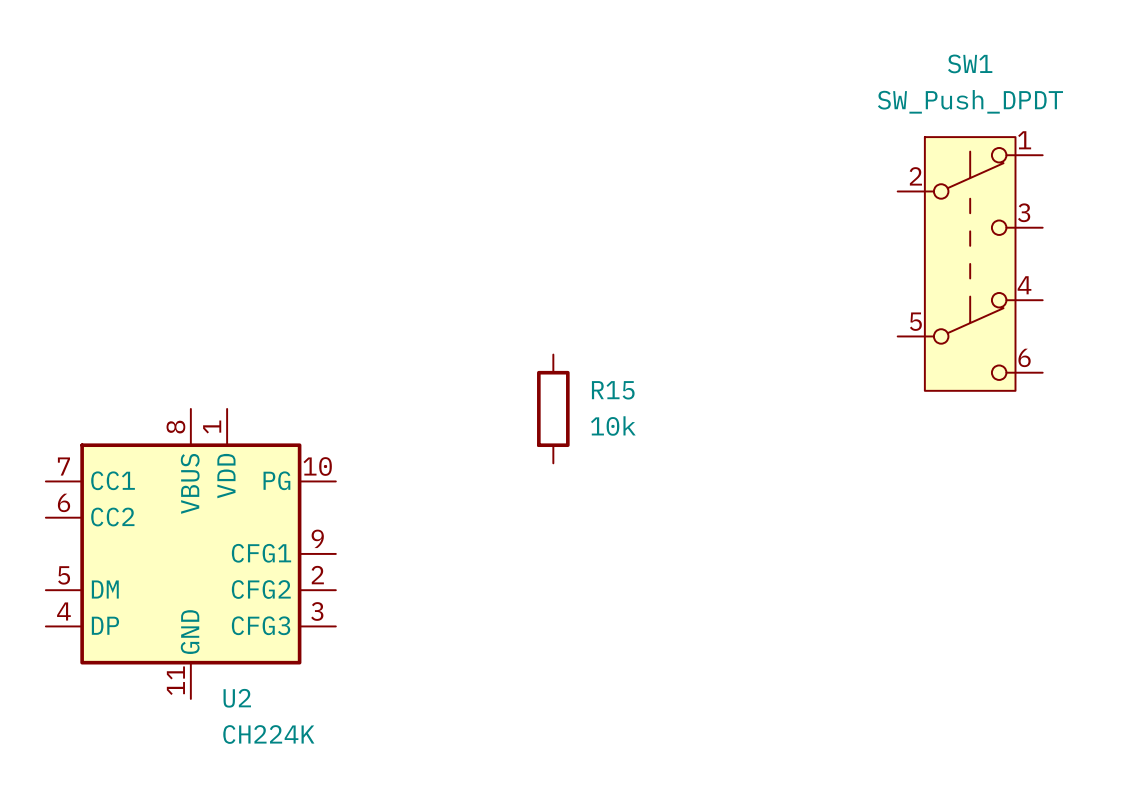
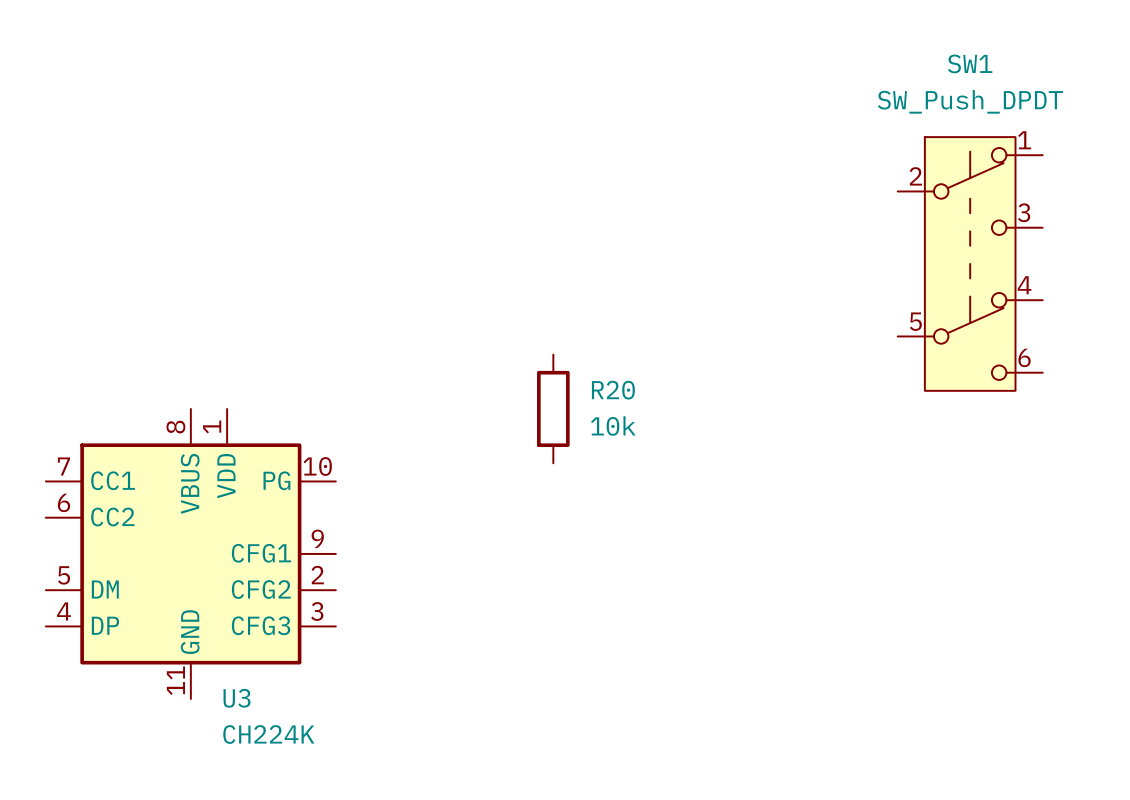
R15 name: R15 (613, 390) -> R20 (613, 390)
U2 name: U2 (237, 698) -> U3 (237, 698)

